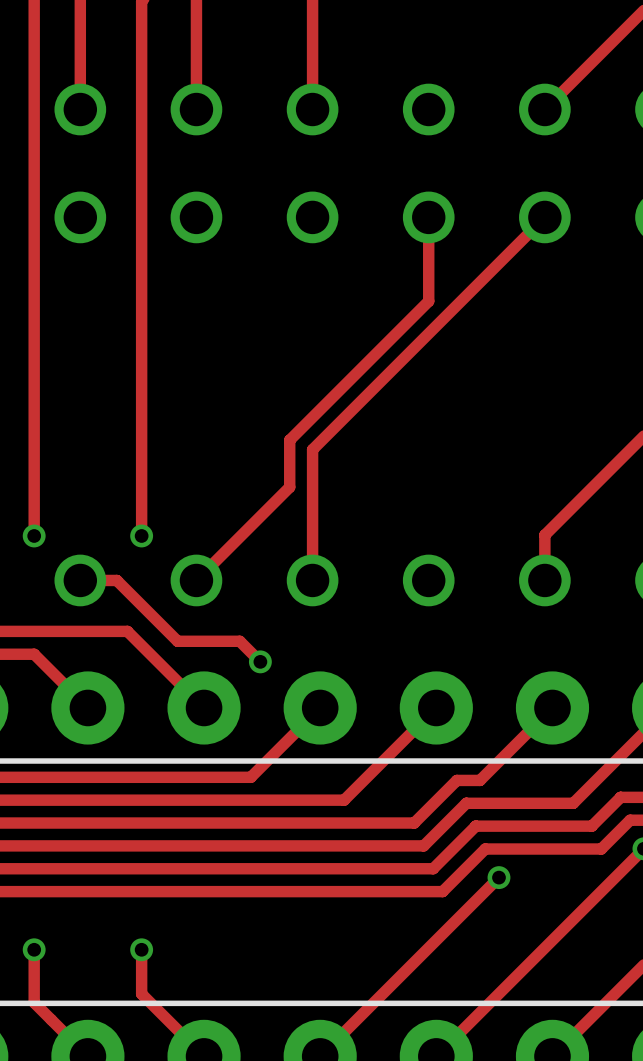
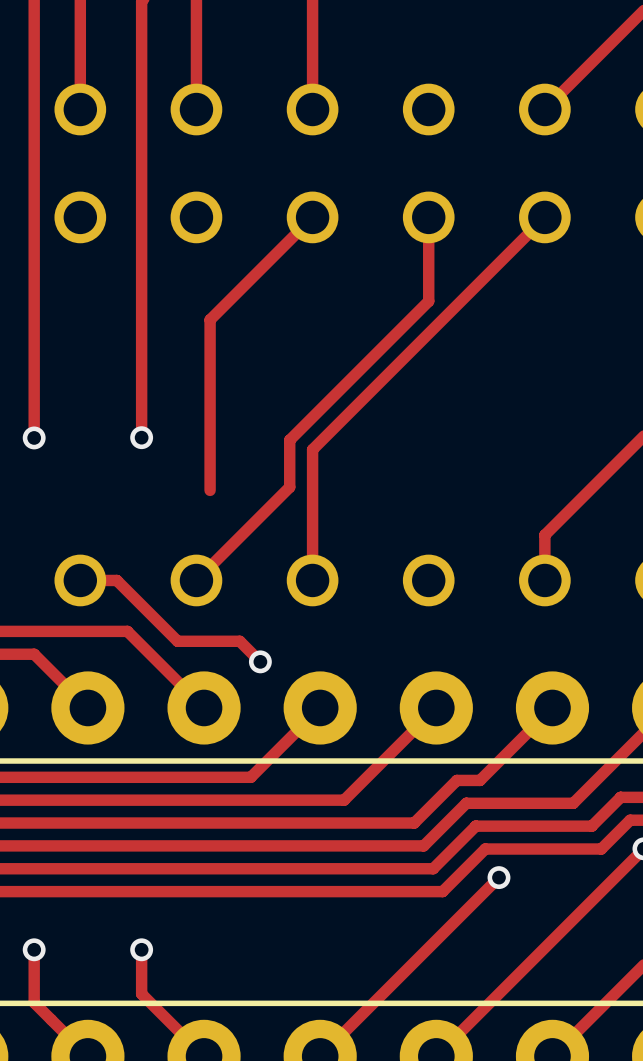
track: none -> (312, 217) (210, 319) (210, 490)
track: (34, 437) (34, 535) -> none
via: none -> (34, 437)
track: (141, 437) (141, 535) -> none
via: none -> (141, 437)
via: (34, 535) -> none
via: (141, 535) -> none

